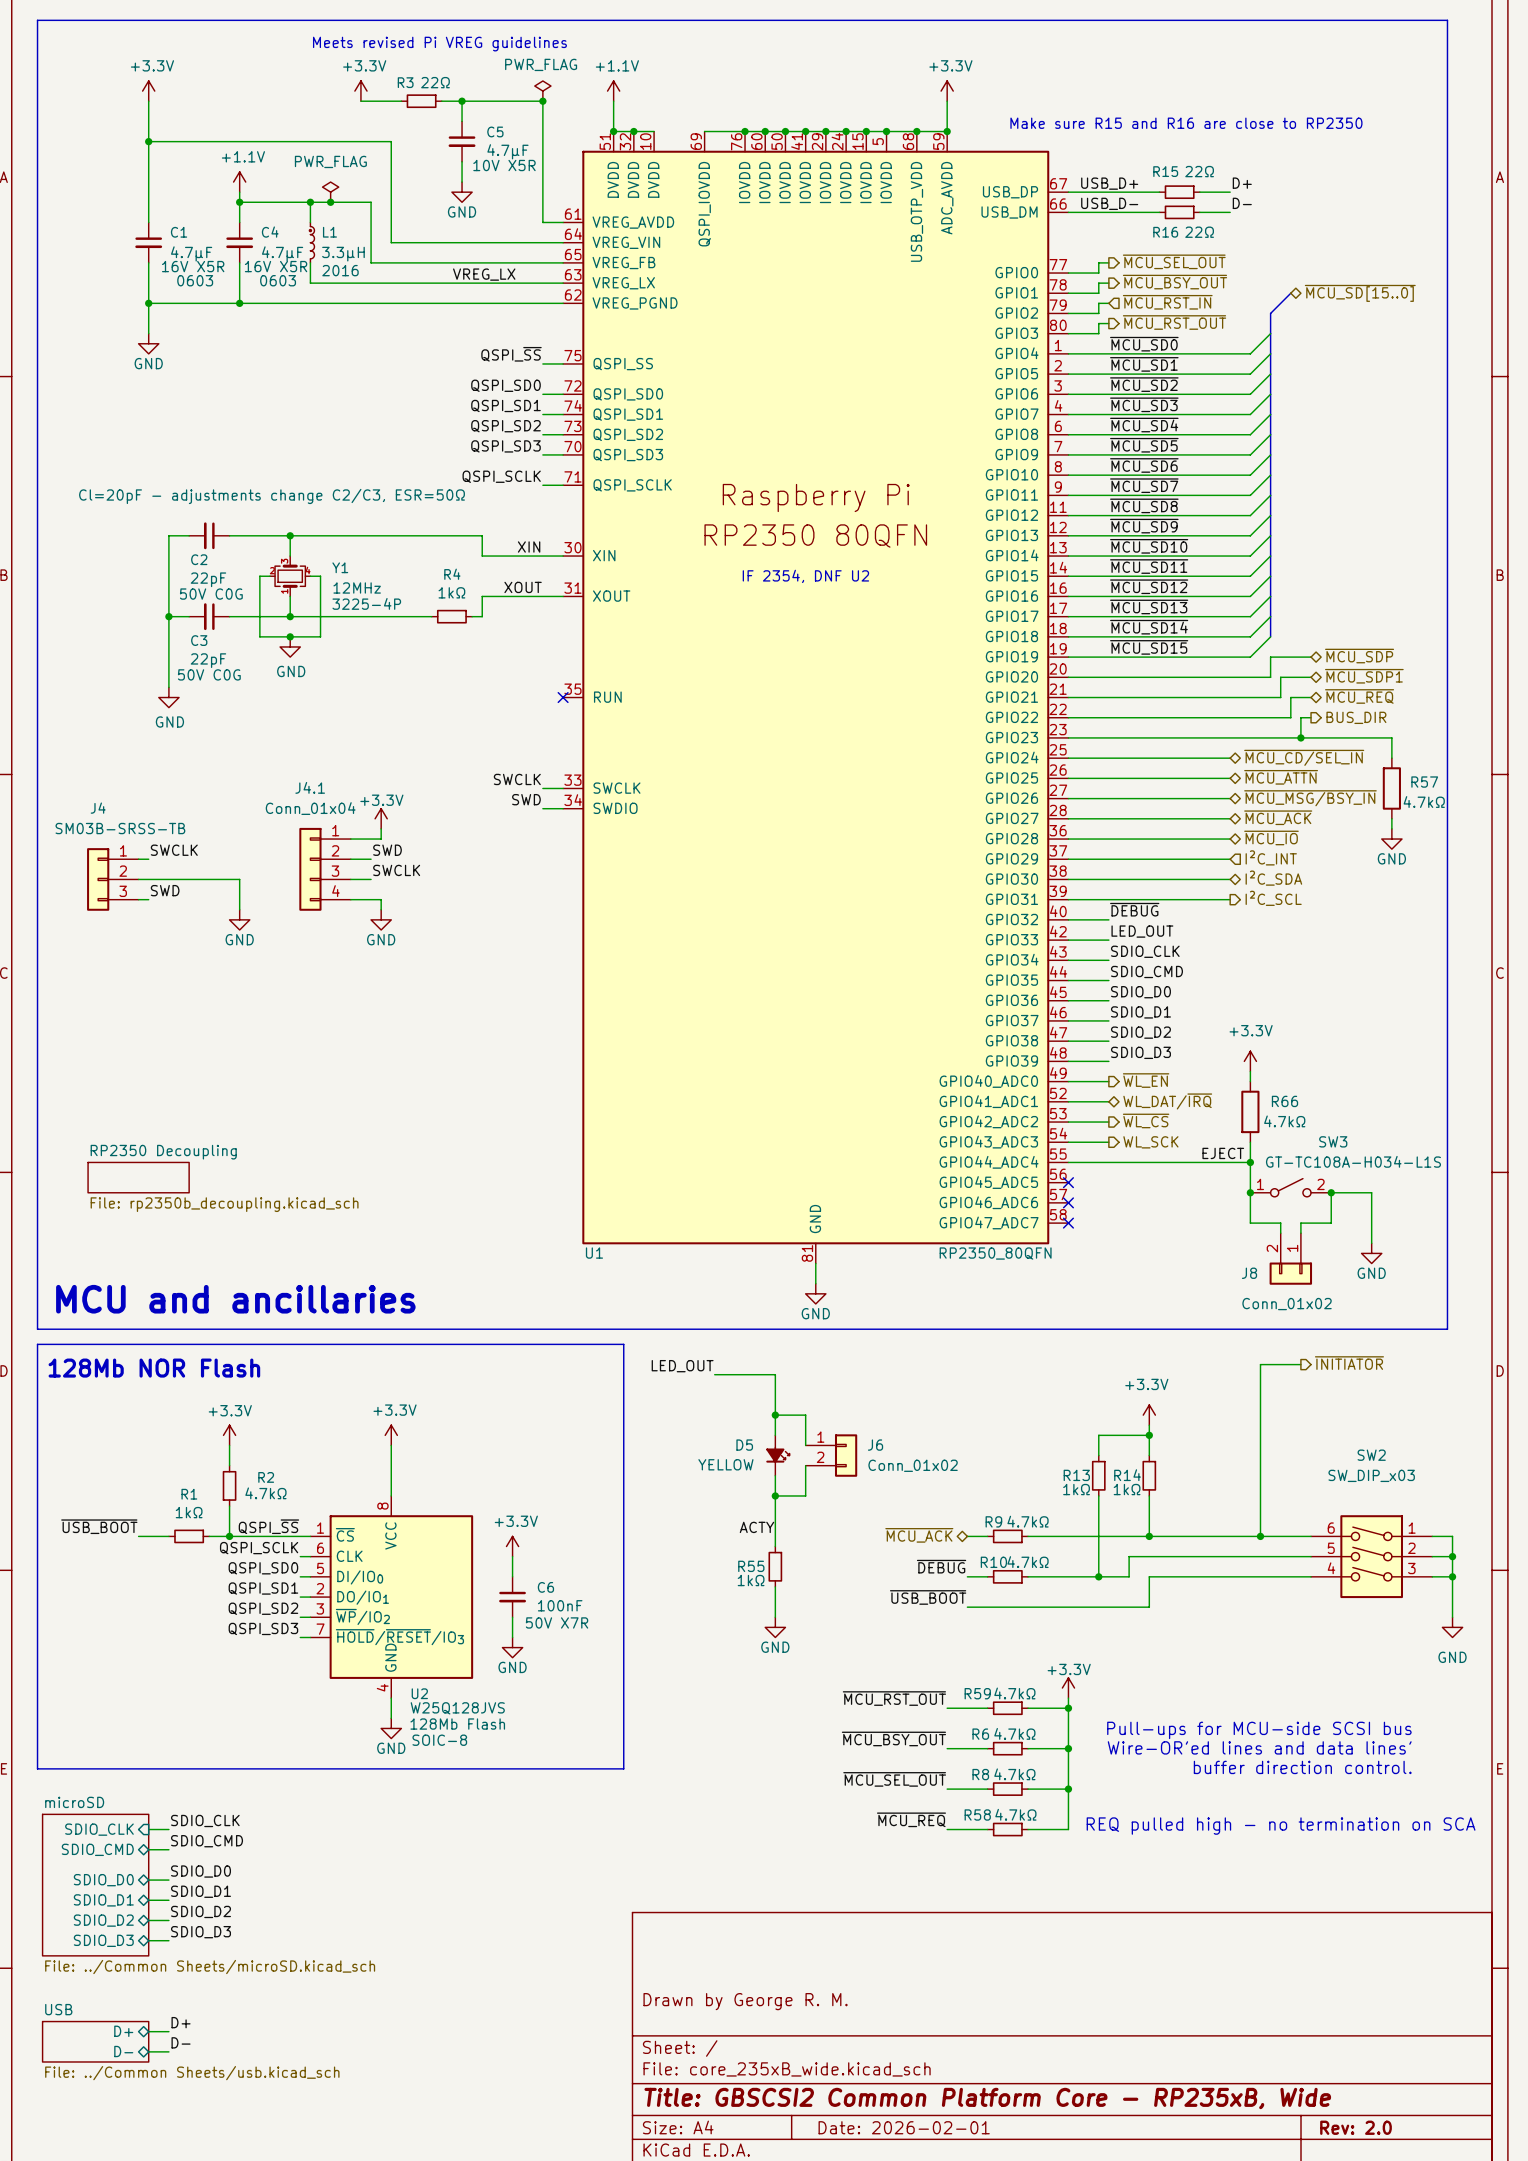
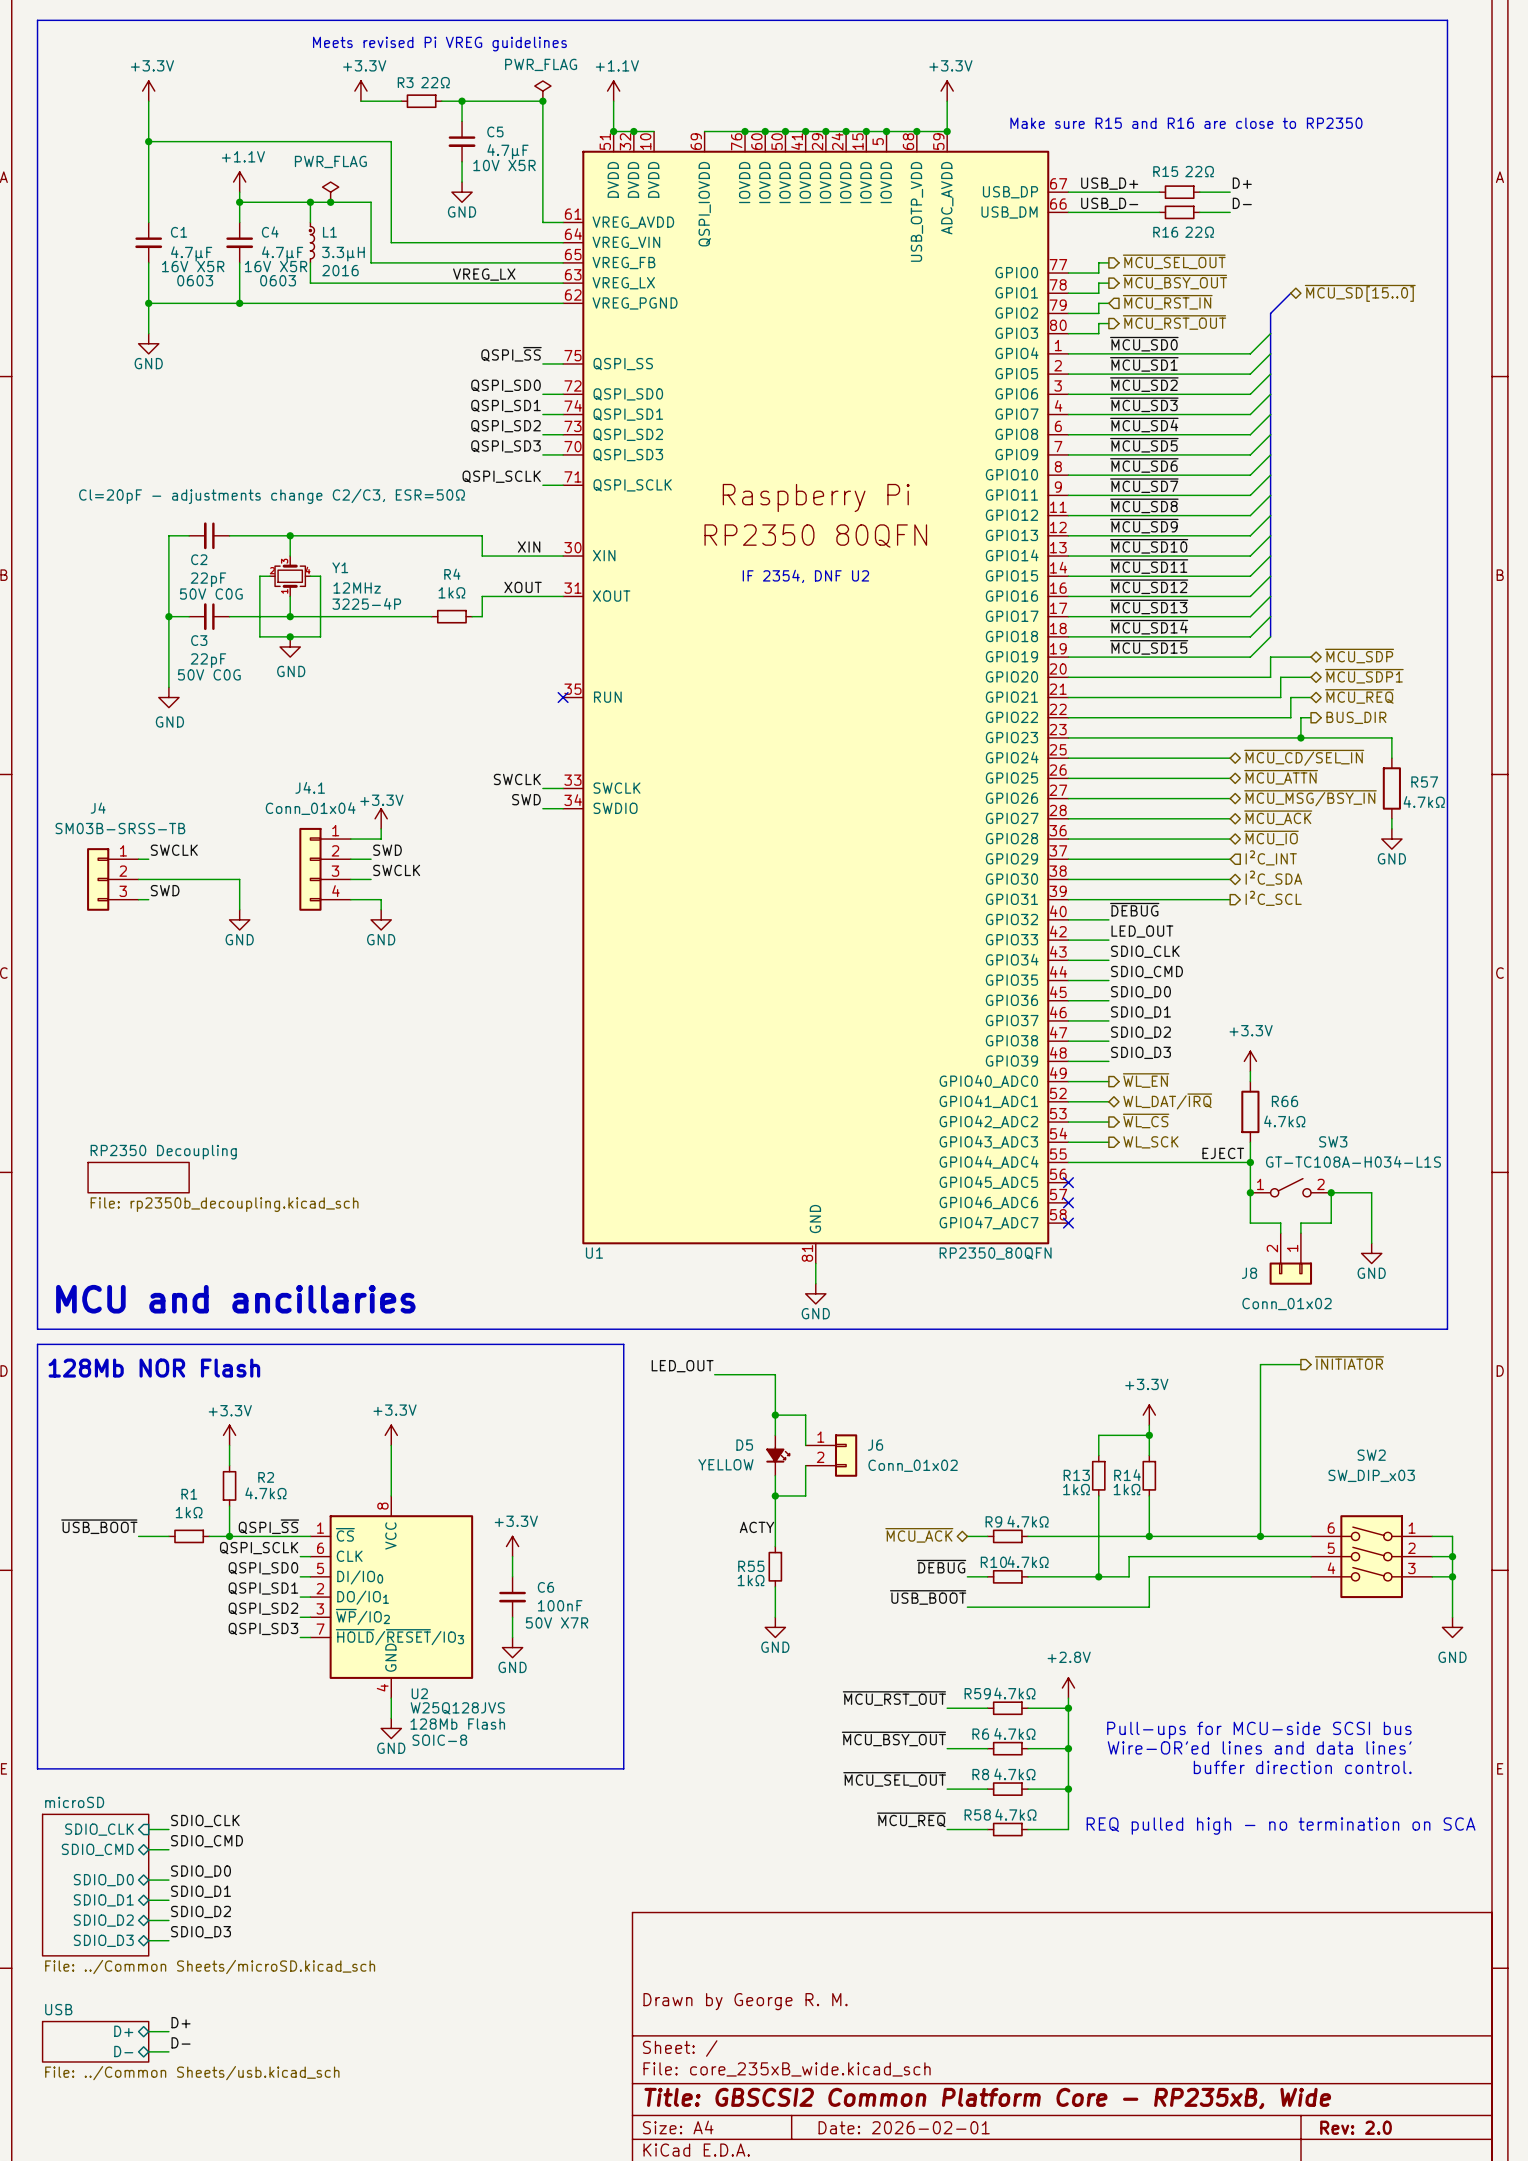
power symbol: +3.3V (1068, 1688) -> +2.8V (1068, 1688)

